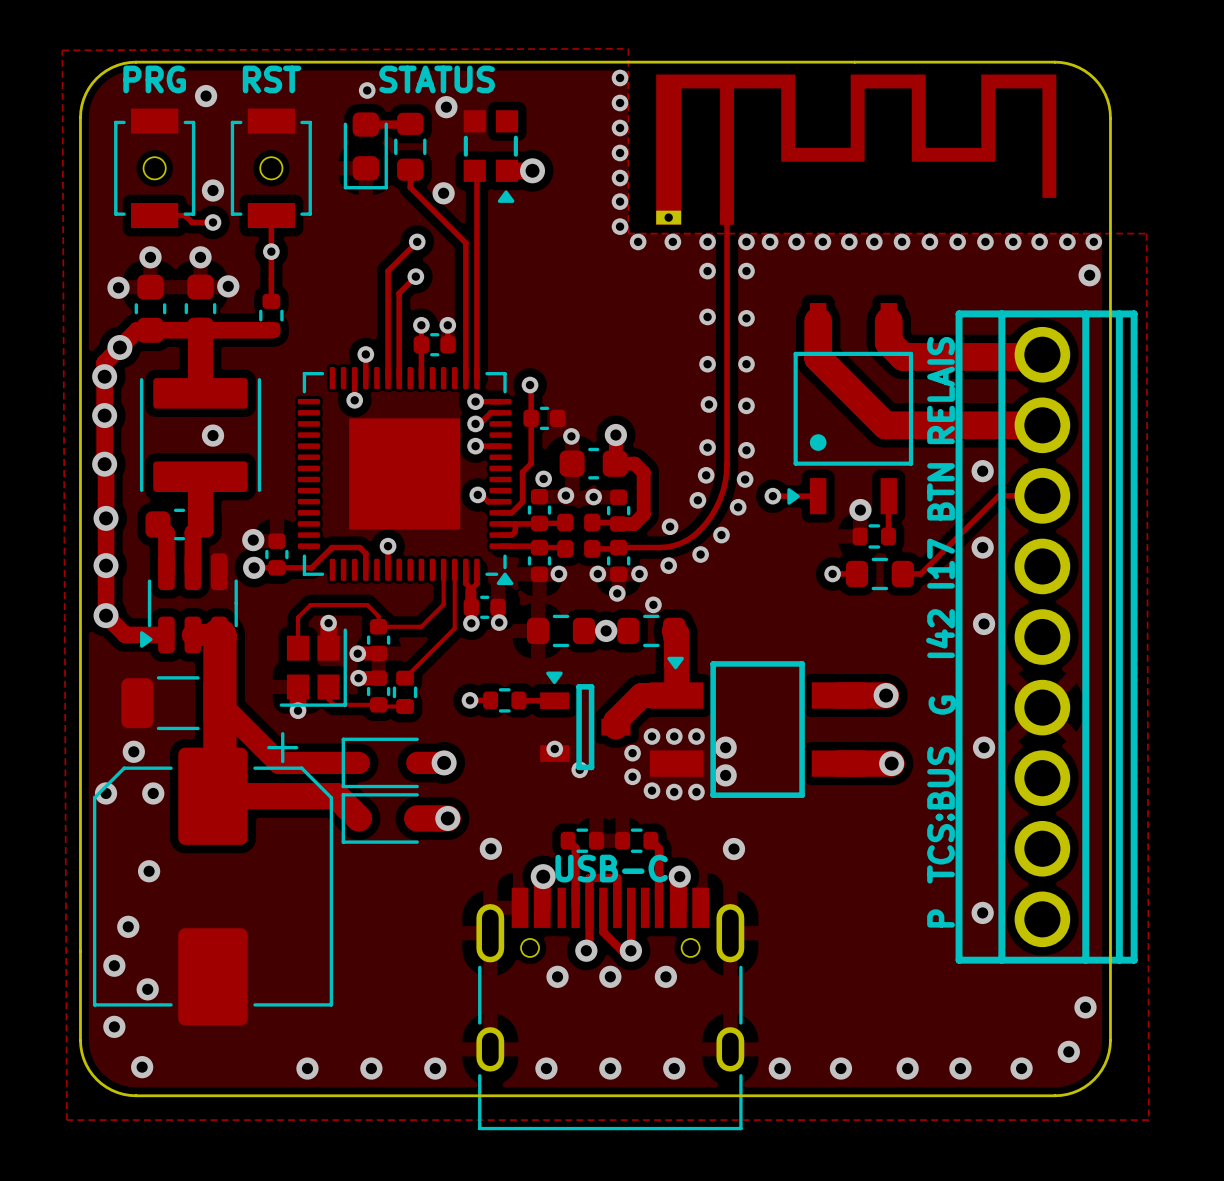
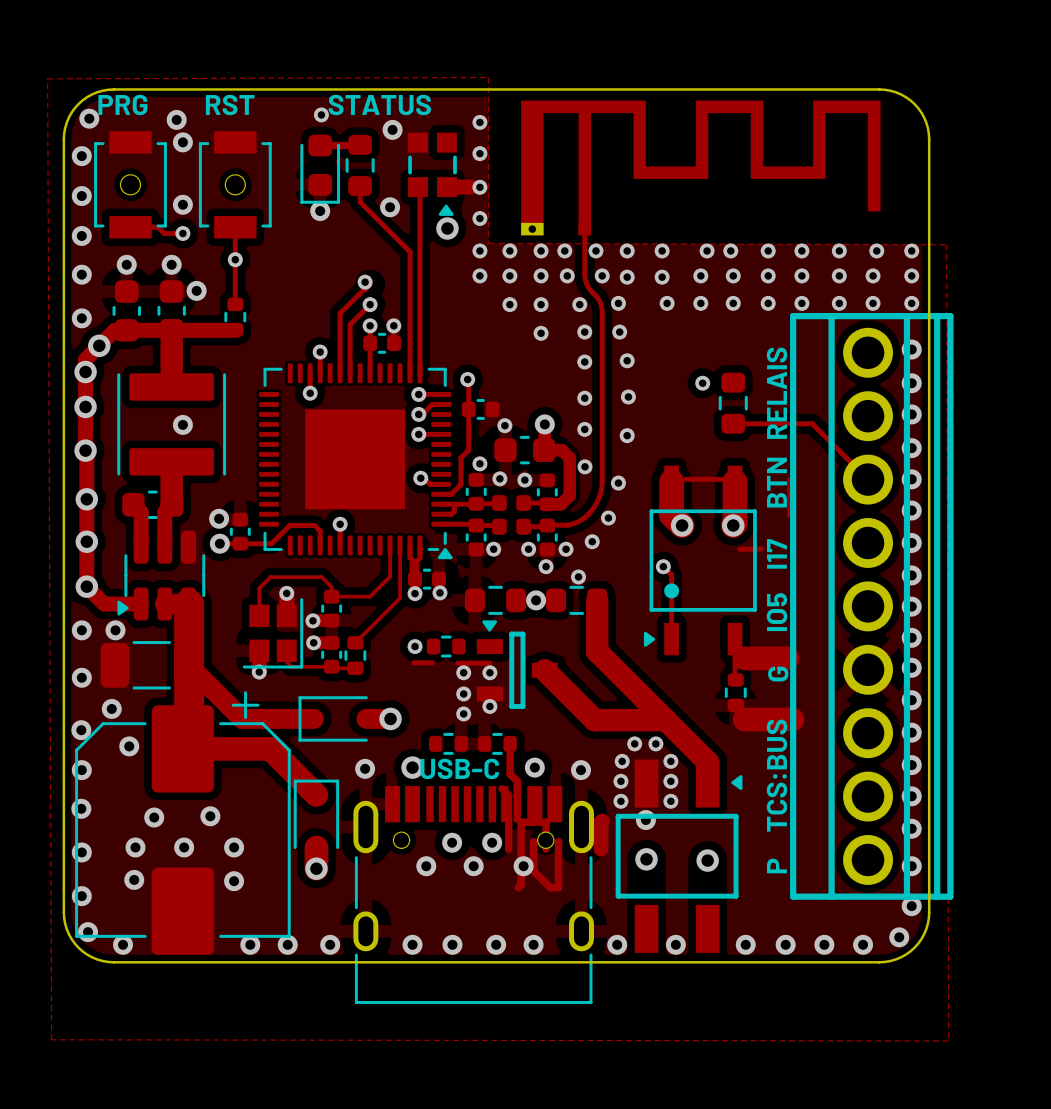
zone outline: (62, 50) (628, 48) (628, 233) (1146, 233) (1148, 1120) (66, 1120) -> (47, 78) (488, 77) (488, 243) (946, 244) (948, 1041) (51, 1039)
board edge: (988, 62) (1054, 62) (1073, 65) (1089, 74) (1098, 83) (1105, 93) (1110, 112) (1110, 1040) (1104, 1064) (1094, 1079) (1079, 1090) (1054, 1095) (129, 1095) (106, 1087) (96, 1079) (85, 1064) (80, 1046) (80, 978) -> (879, 89) (895, 92) (914, 104) (924, 118) (929, 139) (929, 912) (926, 928) (914, 947) (895, 959) (879, 962) (113, 962) (97, 959) (78, 947) (66, 928) (63, 912)
via: (620, 77) -> none
via: none -> (89, 118)
via: none -> (479, 122)
via: (620, 102) -> none
via: none -> (182, 142)
via: (620, 128) -> none
via: none -> (479, 153)
via: none -> (81, 156)
part position: (856, 149) -> (700, 167)
via: (620, 153) -> none
via position: (532, 170) -> (447, 228)
via: none -> (479, 187)
via: (620, 178) -> none
via: none -> (81, 196)
via: none -> (320, 211)
via: (620, 201) -> none
via: none -> (479, 218)
track: (727, 217) (727, 464) (722, 491) (711, 516) (698, 531) (687, 540) (666, 547) (617, 548) -> (584, 229) (585, 279) (588, 288) (599, 300) (602, 310) (602, 485) (596, 503) (582, 519) (567, 525) (546, 526)
via: none -> (81, 235)
via position: (620, 226) -> (541, 250)
track: (417, 241) (388, 271) (388, 311) -> (370, 284) (340, 313)
via position: (417, 241) -> (370, 304)
via: none -> (479, 250)
via: none -> (509, 250)
via: (770, 241) -> none
via: (849, 241) -> none
via: none -> (768, 250)
via: (874, 241) -> none
via: (929, 241) -> none
via: none -> (839, 250)
via: (957, 241) -> none
via: (1013, 241) -> none
via: none -> (911, 250)
via: (1039, 241) -> none
via: (1067, 241) -> none
via: (1093, 241) -> none
via: none -> (479, 275)
via: none -> (509, 275)
via: none -> (541, 275)
via: none -> (567, 275)
via: none -> (602, 275)
via: none -> (700, 275)
via: none -> (733, 275)
via: none -> (768, 275)
via: none -> (801, 275)
via: none -> (839, 275)
via: none -> (873, 275)
via: none -> (911, 275)
via: (1089, 275) -> none
track: (415, 276) (399, 293) (399, 323) -> (370, 304) (350, 324)
via position: (118, 287) -> (81, 274)
via: none -> (618, 303)
via: none -> (700, 303)
via: none -> (733, 303)
via: none -> (768, 303)
via: none -> (801, 303)
via: none -> (839, 303)
via: none -> (873, 303)
via: none -> (911, 303)
via: none -> (509, 304)
via: none -> (541, 304)
via: none -> (579, 304)
part footprint: [787, 303, 914, 515] -> [718, 372, 748, 434]
via: none -> (81, 318)
via: (707, 316) -> none
via position: (746, 318) -> (667, 303)
track: (818, 321) (818, 358) (885, 425) (1042, 425) -> none
track: (888, 321) (888, 342) (903, 356) (1038, 356) -> none
via: none -> (584, 332)
via: none -> (619, 332)
via: none -> (541, 333)
via: none -> (911, 349)
via: (746, 364) -> none
via: none -> (584, 362)
via: none -> (702, 383)
via: none -> (911, 383)
text position: RELAIS (941, 390) -> RELAIS (776, 393)
via: none -> (584, 398)
via: (746, 405) -> none
via: none -> (911, 414)
track: none -> (733, 423) (812, 423) (868, 479)
via: none -> (584, 429)
via: (746, 450) -> none
via: none -> (911, 448)
via: (982, 471) -> none
via: (706, 475) -> none
via: (745, 479) -> none
via: none -> (585, 466)
text position: BTN (941, 491) -> BTN (776, 482)
track: (1042, 495) (998, 495) (920, 573) (902, 573) -> none
via: (772, 496) -> none
via: none -> (911, 479)
track: none -> (671, 481) (671, 515) (682, 525)
track: none -> (735, 481) (735, 523) (733, 525)
via: (738, 507) -> none
via: (860, 510) -> none
via: (670, 526) -> none
via: none -> (911, 510)
via: (721, 535) -> none
part: (874, 536) -> none
via: none -> (608, 518)
via: none -> (682, 525)
via: none -> (733, 525)
via: (982, 547) -> none
via: (700, 554) -> none
text position: I17 (941, 563) -> I17 (776, 553)
via: none -> (911, 542)
via: (832, 573) -> none
part: (879, 573) -> none
part: none -> (700, 560)
track: none -> (663, 566) (671, 574) (671, 641)
via: none -> (663, 566)
via: none -> (911, 575)
via: (984, 623) -> none
track: (674, 630) (676, 633) (676, 695) (641, 695) (615, 721) (615, 727) -> (597, 600) (597, 651) (707, 762) (707, 783)
text: I42 (940, 633) -> none
text: none -> IO5 (777, 612)
via: none -> (911, 606)
part position: (1046, 637) -> (871, 606)
via: none -> (81, 630)
via: none -> (115, 630)
via: none -> (911, 637)
track: none -> (735, 639) (735, 681)
via: (886, 695) -> none
via position: (470, 700) -> (415, 646)
part position: (504, 700) -> (446, 646)
text position: G (942, 705) -> G (778, 674)
via: none -> (911, 667)
track: none -> (544, 670) (594, 720) (665, 720)
via: none -> (463, 672)
via: none -> (489, 672)
via: none -> (81, 677)
part position: (585, 720) -> (517, 664)
part rotation: 0° (757, 727) -> 90° clockwise (679, 856)
part position: (757, 727) -> (679, 856)
part: none -> (735, 692)
via: none -> (463, 693)
via: (652, 736) -> none
via: (674, 736) -> none
via: (696, 736) -> none
via: none -> (911, 700)
via: (725, 747) -> none
via: (984, 747) -> none
via: (632, 753) -> none
via: none -> (463, 713)
via: (891, 763) -> none
via: (579, 769) -> none
via: (725, 775) -> none
via: (632, 776) -> none
via: none -> (911, 732)
part: none -> (448, 743)
part: none -> (497, 743)
track: none -> (510, 743) (510, 774) (517, 781) (517, 796)
via: (652, 790) -> none
via: none -> (634, 743)
via: none -> (655, 743)
via: (674, 792) -> none
via: (696, 792) -> none
via position: (106, 793) -> (81, 730)
track: (310, 796) (336, 796) (358, 818) -> (270, 748) (316, 795)
via: none -> (622, 761)
via: none -> (670, 761)
via: none -> (911, 765)
text position: TCS:BUS (941, 815) -> TCS:BUS (776, 775)
via: none -> (534, 767)
part rotation: 0° (383, 818) -> 90° clockwise (316, 817)
part position: (383, 818) -> (316, 817)
via: none -> (365, 768)
track: (417, 818) (447, 818) -> none
via position: (447, 818) -> (412, 767)
via: none -> (81, 770)
via: none -> (581, 770)
via: none -> (620, 781)
via: none -> (670, 781)
part: (582, 840) -> none
part: (636, 840) -> none
track: (650, 840) (658, 848) (658, 899) -> none
via: (490, 848) -> none
via: (733, 849) -> none
via: none -> (911, 796)
via: none -> (620, 801)
via: none -> (670, 801)
via: none -> (81, 808)
text position: USB-C (611, 868) -> USB-C (459, 768)
via: (149, 871) -> none
via: none -> (210, 816)
via: none -> (154, 817)
via: none -> (645, 820)
via: (543, 876) -> none
via: (679, 876) -> none
via: none -> (911, 828)
via: none -> (452, 842)
via: none -> (492, 842)
via: none -> (135, 847)
via: none -> (184, 847)
via: none -> (234, 847)
track: none -> (316, 847) (316, 868)
via: none -> (81, 852)
via: (982, 912) -> none
text position: P (941, 918) -> P (776, 866)
via: none -> (646, 859)
via: none -> (707, 860)
via: (128, 926) -> none
via: none -> (426, 866)
via: none -> (473, 866)
via: none -> (523, 866)
via: none -> (911, 866)
via: none -> (316, 868)
via: none -> (134, 879)
via: none -> (234, 881)
via: (586, 950) -> none
via: (630, 950) -> none
via position: (114, 965) -> (81, 896)
via: none -> (911, 906)
via: (557, 976) -> none
via: (610, 976) -> none
via: (665, 976) -> none
via: (147, 989) -> none
via: none -> (88, 932)
via: none -> (899, 937)
via: (1085, 1007) -> none
part position: (610, 1008) -> (473, 895)
via: none -> (123, 944)
via: none -> (250, 944)
via: none -> (287, 944)
via: none -> (330, 944)
via: none -> (412, 944)
via: none -> (452, 944)
via: none -> (496, 944)
via: none -> (533, 944)
via: none -> (617, 944)
via: none -> (675, 944)
via: none -> (745, 944)
via: none -> (785, 944)
via: none -> (824, 944)
via: none -> (863, 944)
via: (114, 1026) -> none
via: (1068, 1051) -> none
via: (142, 1067) -> none
via: (307, 1068) -> none
via: (371, 1068) -> none
via: (435, 1068) -> none
via: (546, 1068) -> none
via: (610, 1068) -> none
via: (674, 1068) -> none
via: (779, 1068) -> none
via: (840, 1068) -> none
via: (907, 1068) -> none
via: (960, 1068) -> none
via: (1021, 1068) -> none

